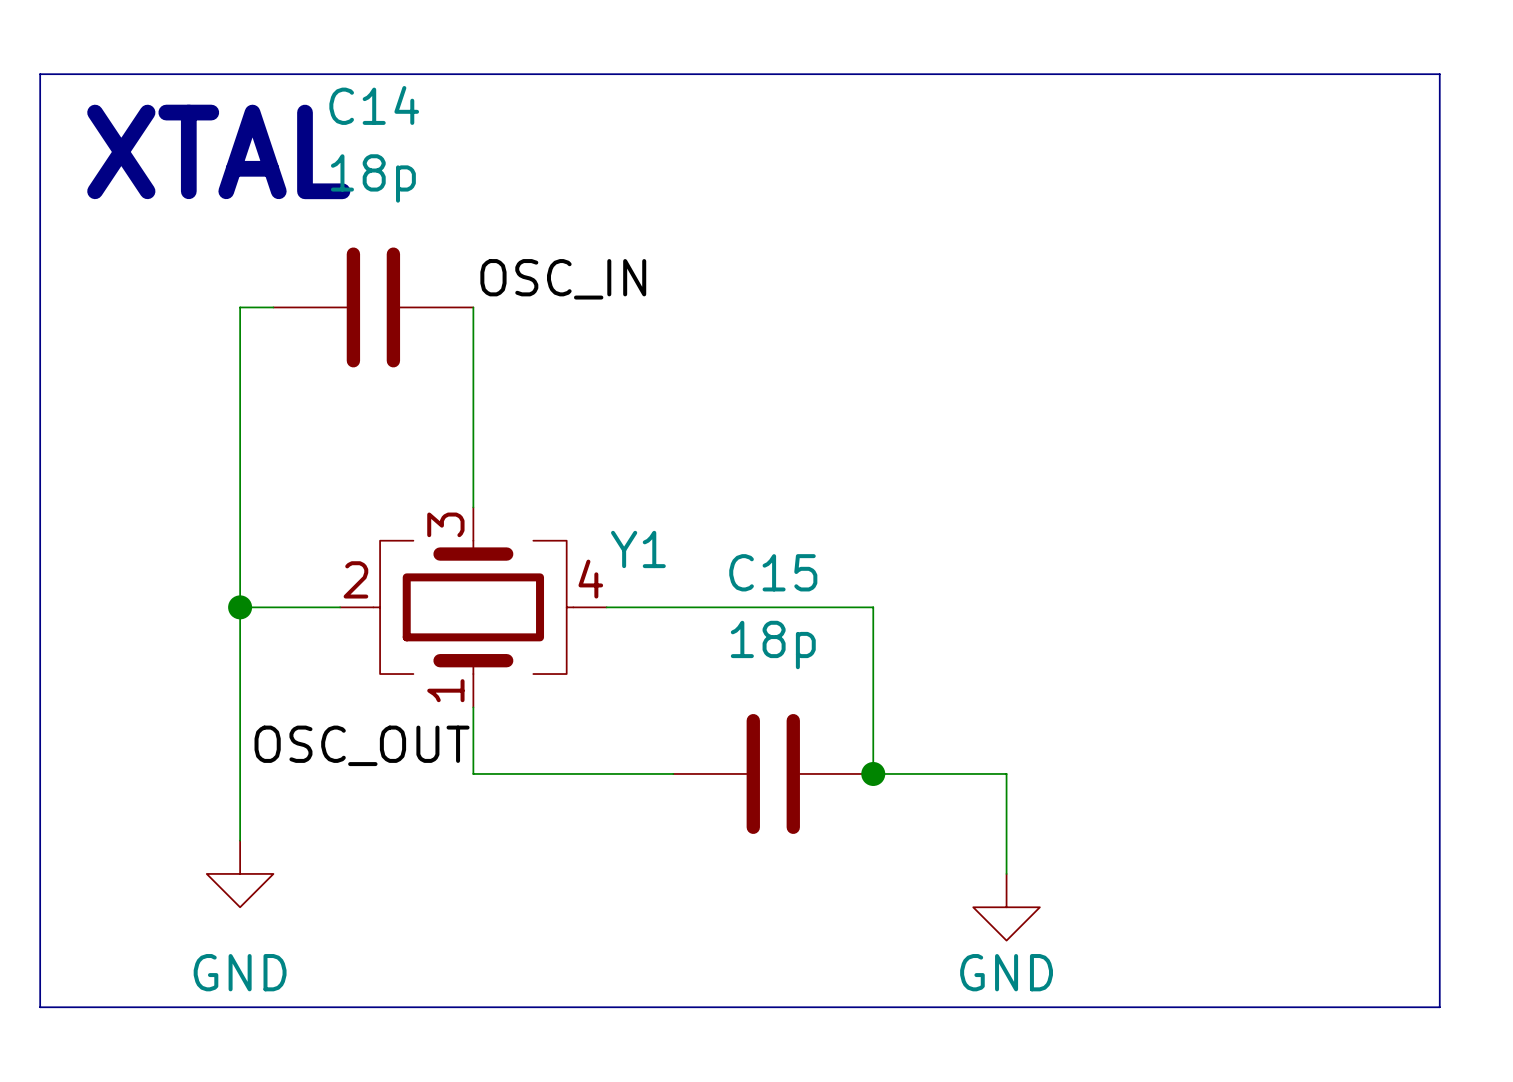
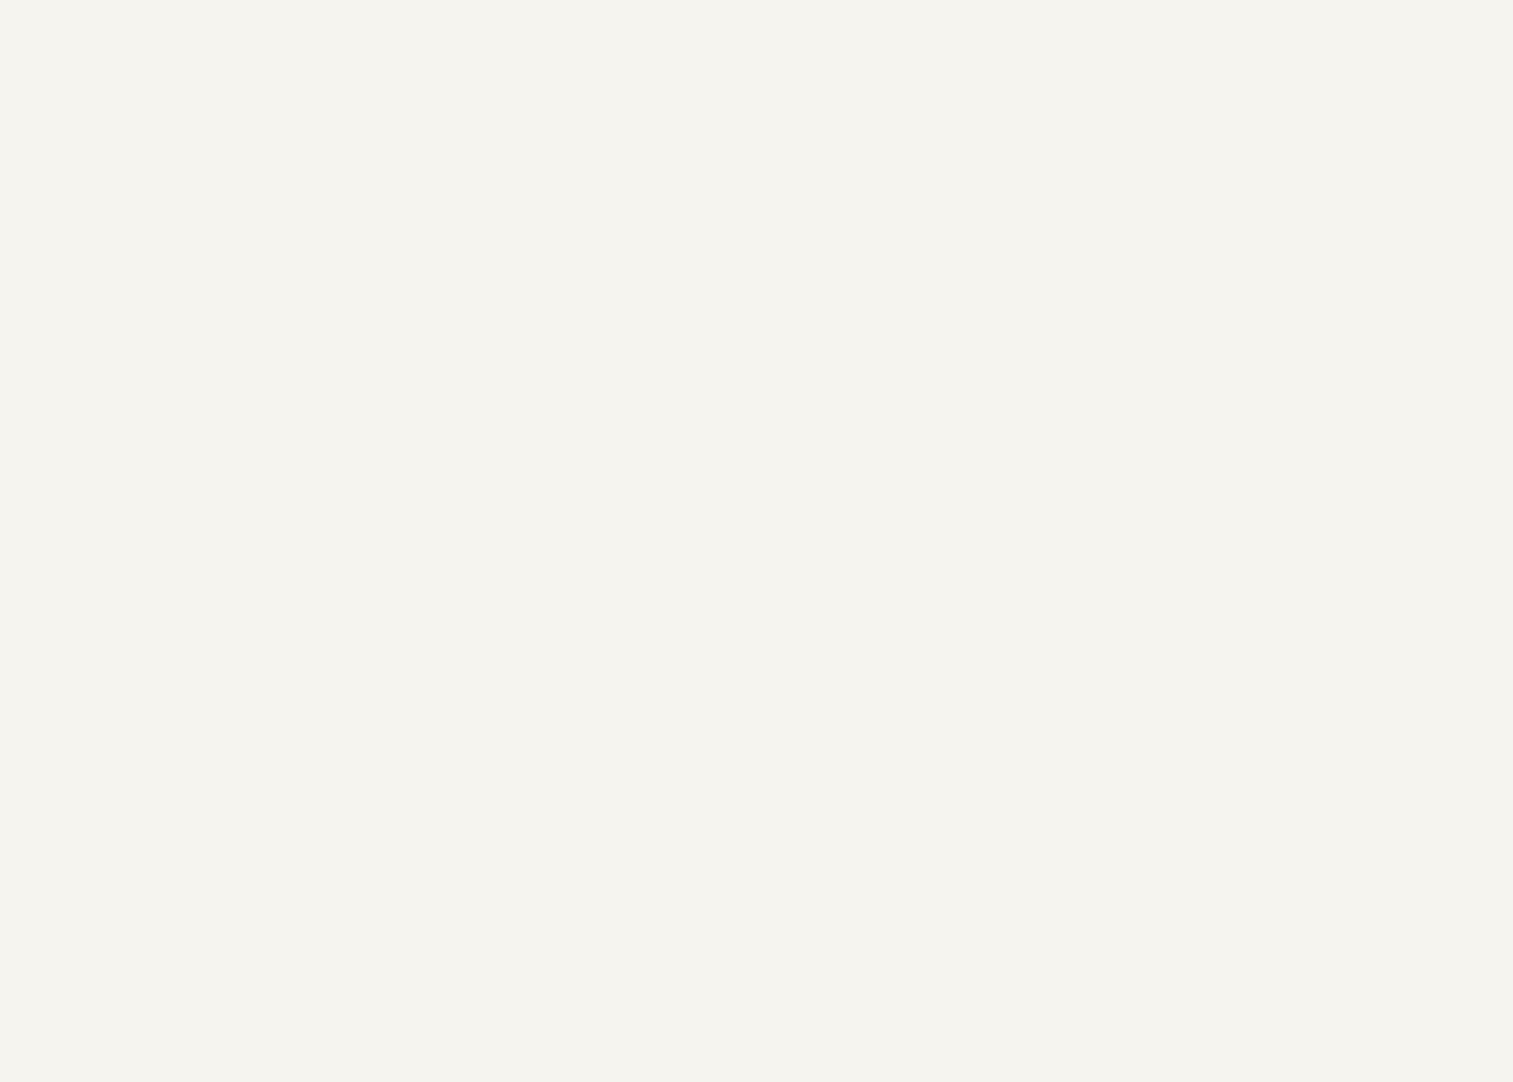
line: (40, 74) (40, 1007) (1439, 1007) (1439, 74) (40, 74) -> none
text: XTAL (218, 151) -> none
label: OSC_IN (563, 279) -> none
wire: (273, 307) (240, 307) (240, 840) -> none
C14: 18p (373, 307) -> none
wire: (473, 307) (473, 507) -> none
wire: (240, 607) (340, 607) -> none
junction: (240, 607) -> none
Y1: (473, 607) -> none
wire: (606, 607) (873, 607) (873, 773) (1006, 773) (1006, 873) -> none
wire: (473, 707) (473, 773) (673, 773) -> none
label: OSC_OUT (362, 745) -> none
C15: 18p (773, 773) -> none
junction: (873, 773) -> none
power symbol: GND (240, 873) -> none
power symbol: GND (1006, 907) -> none

